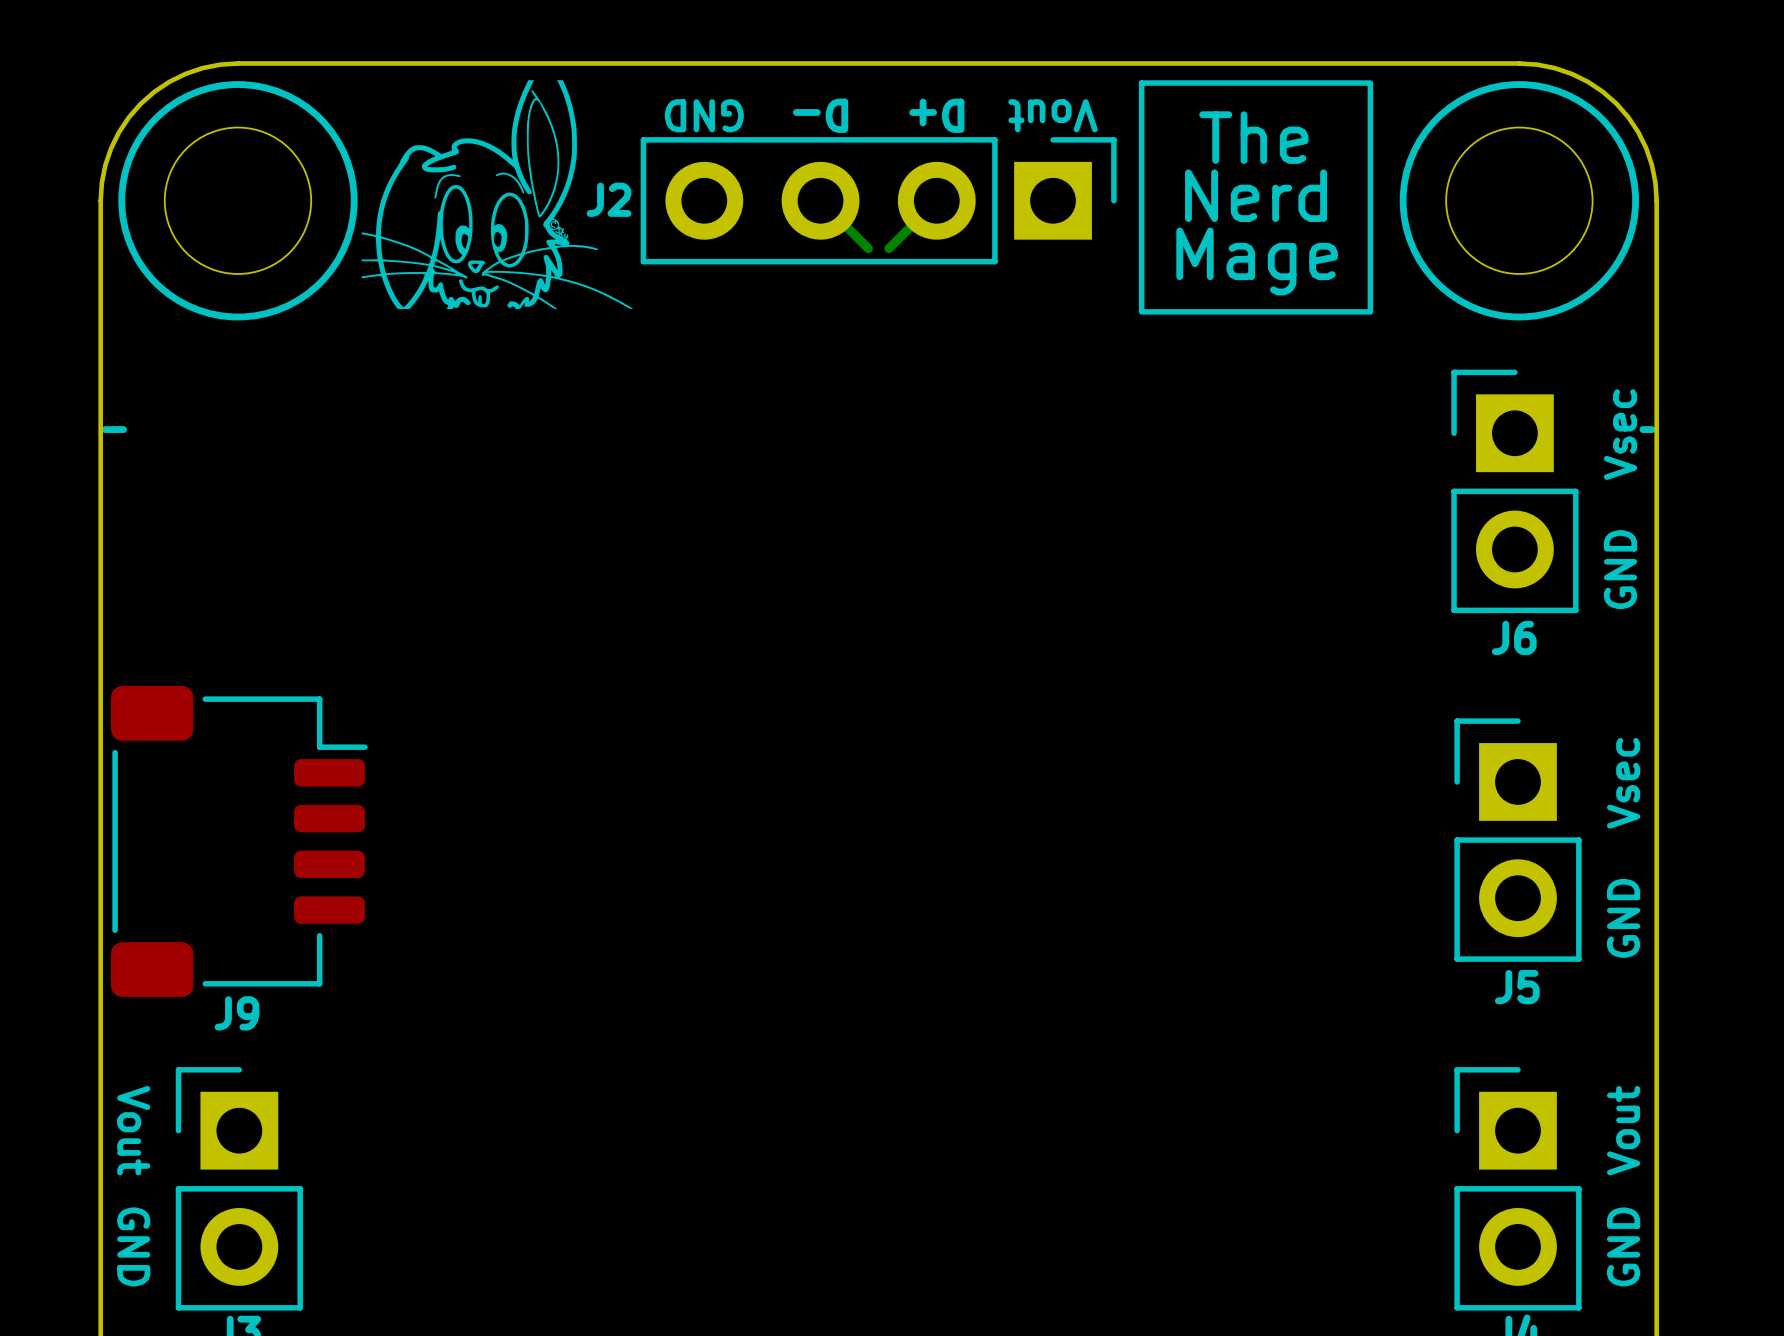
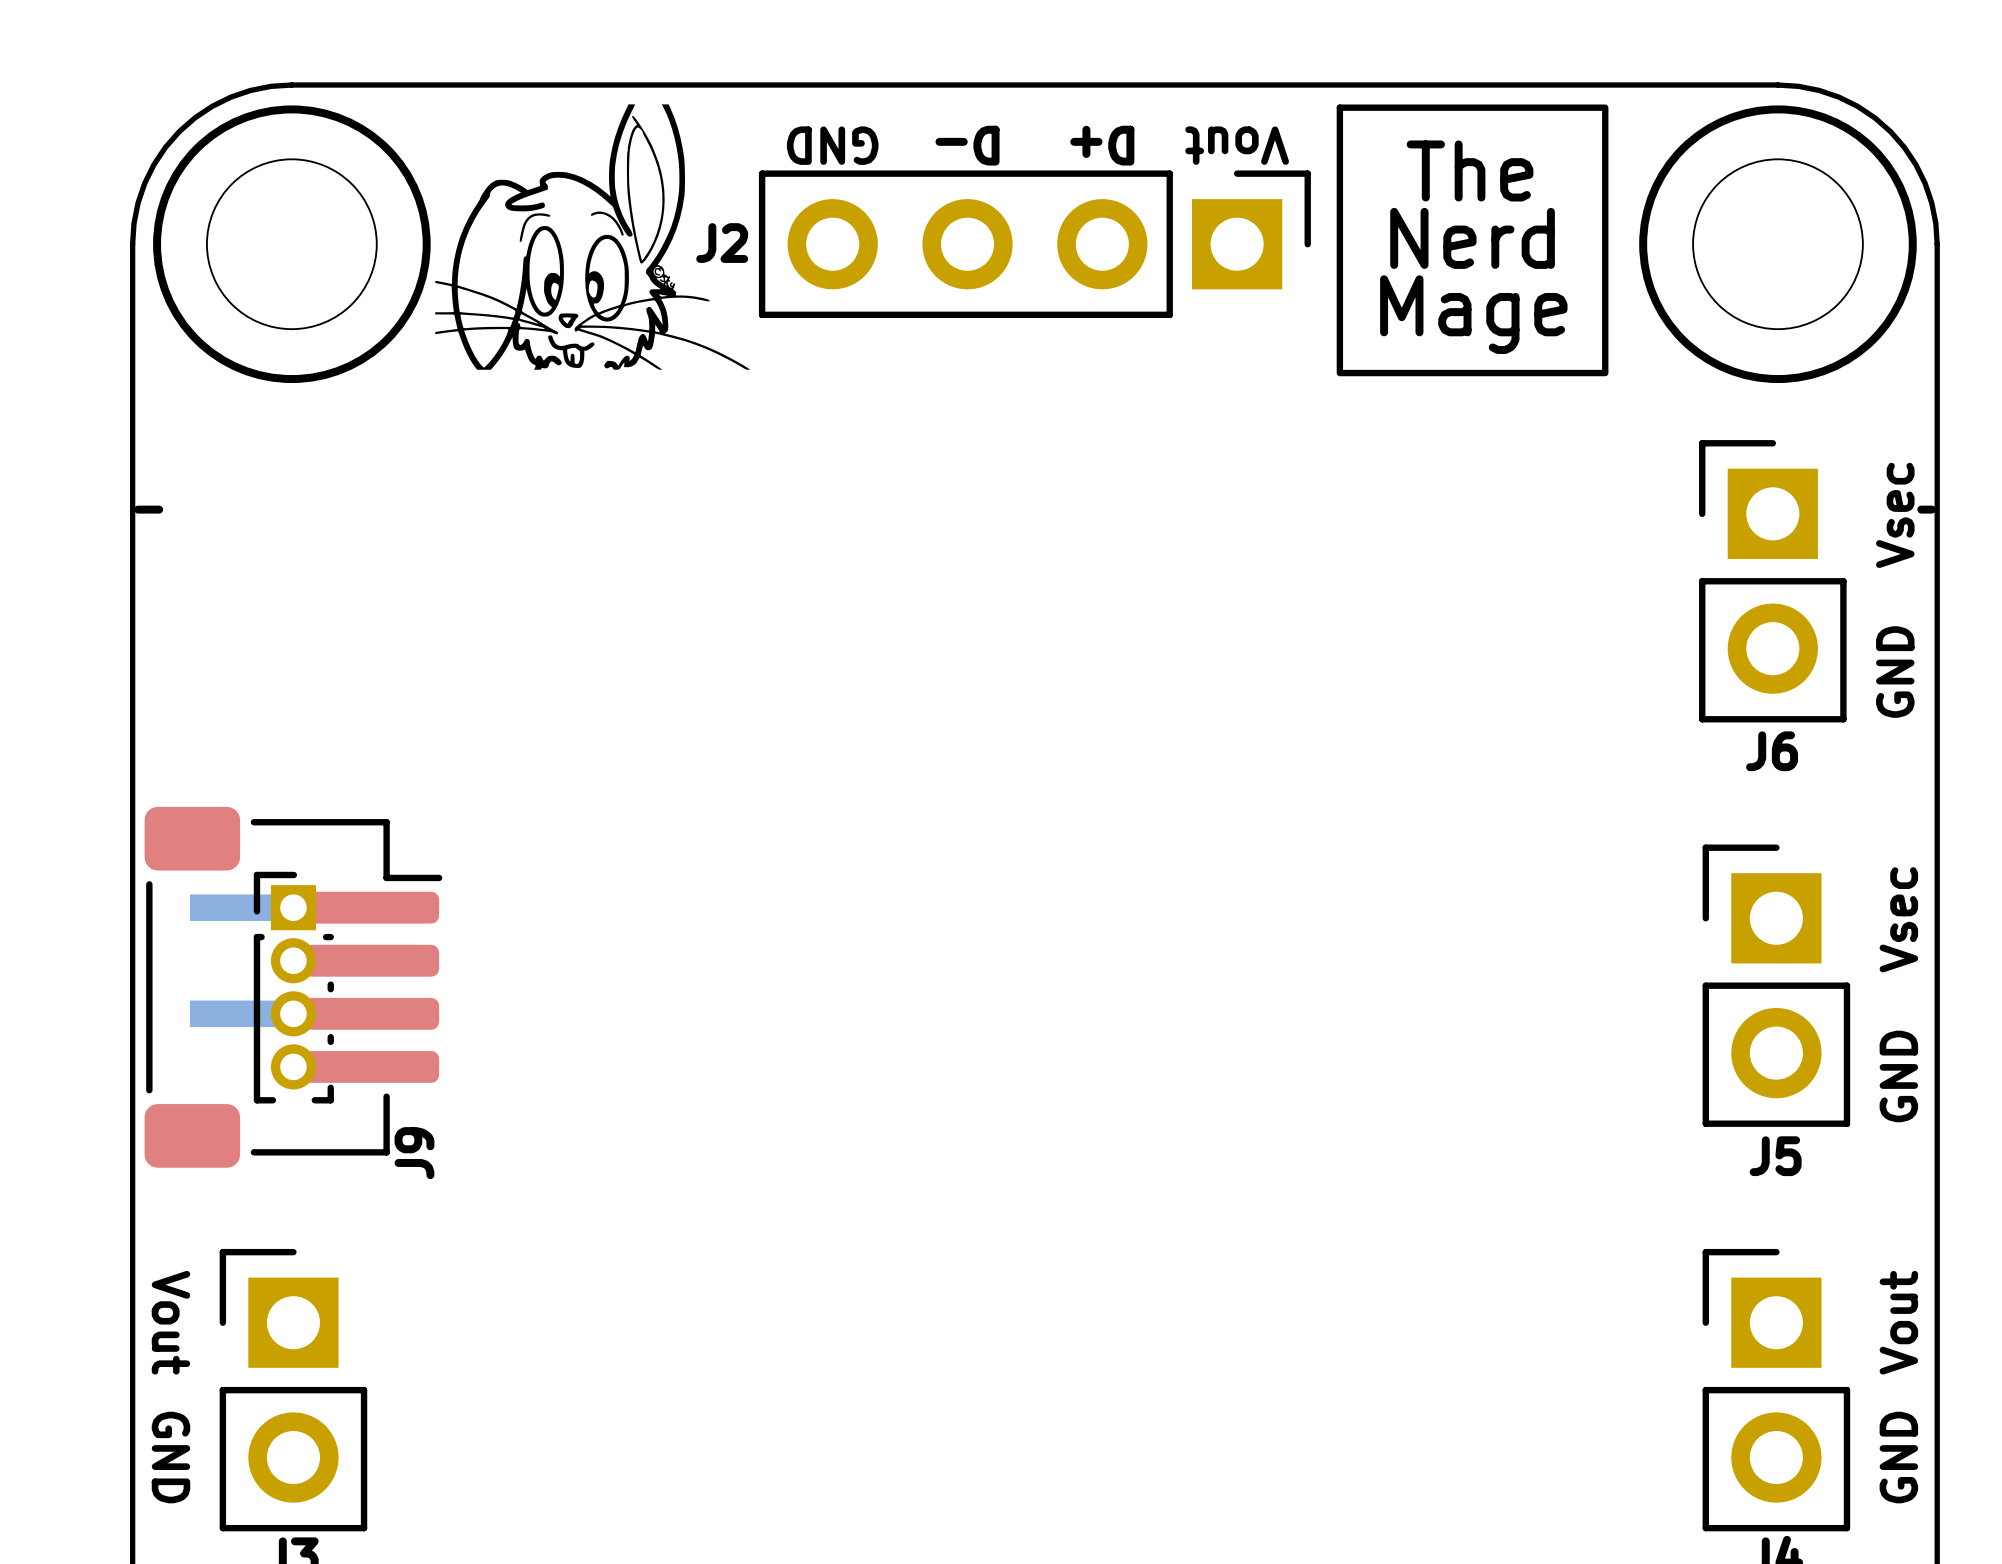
bottom track: (820, 200) (868, 248) -> none
bottom track: (936, 200) (888, 248) -> none
J9 footprint: [110, 685, 368, 998] -> [144, 806, 443, 1168]
J9 name position: J9 (236, 1013) -> J9 (414, 1153)

